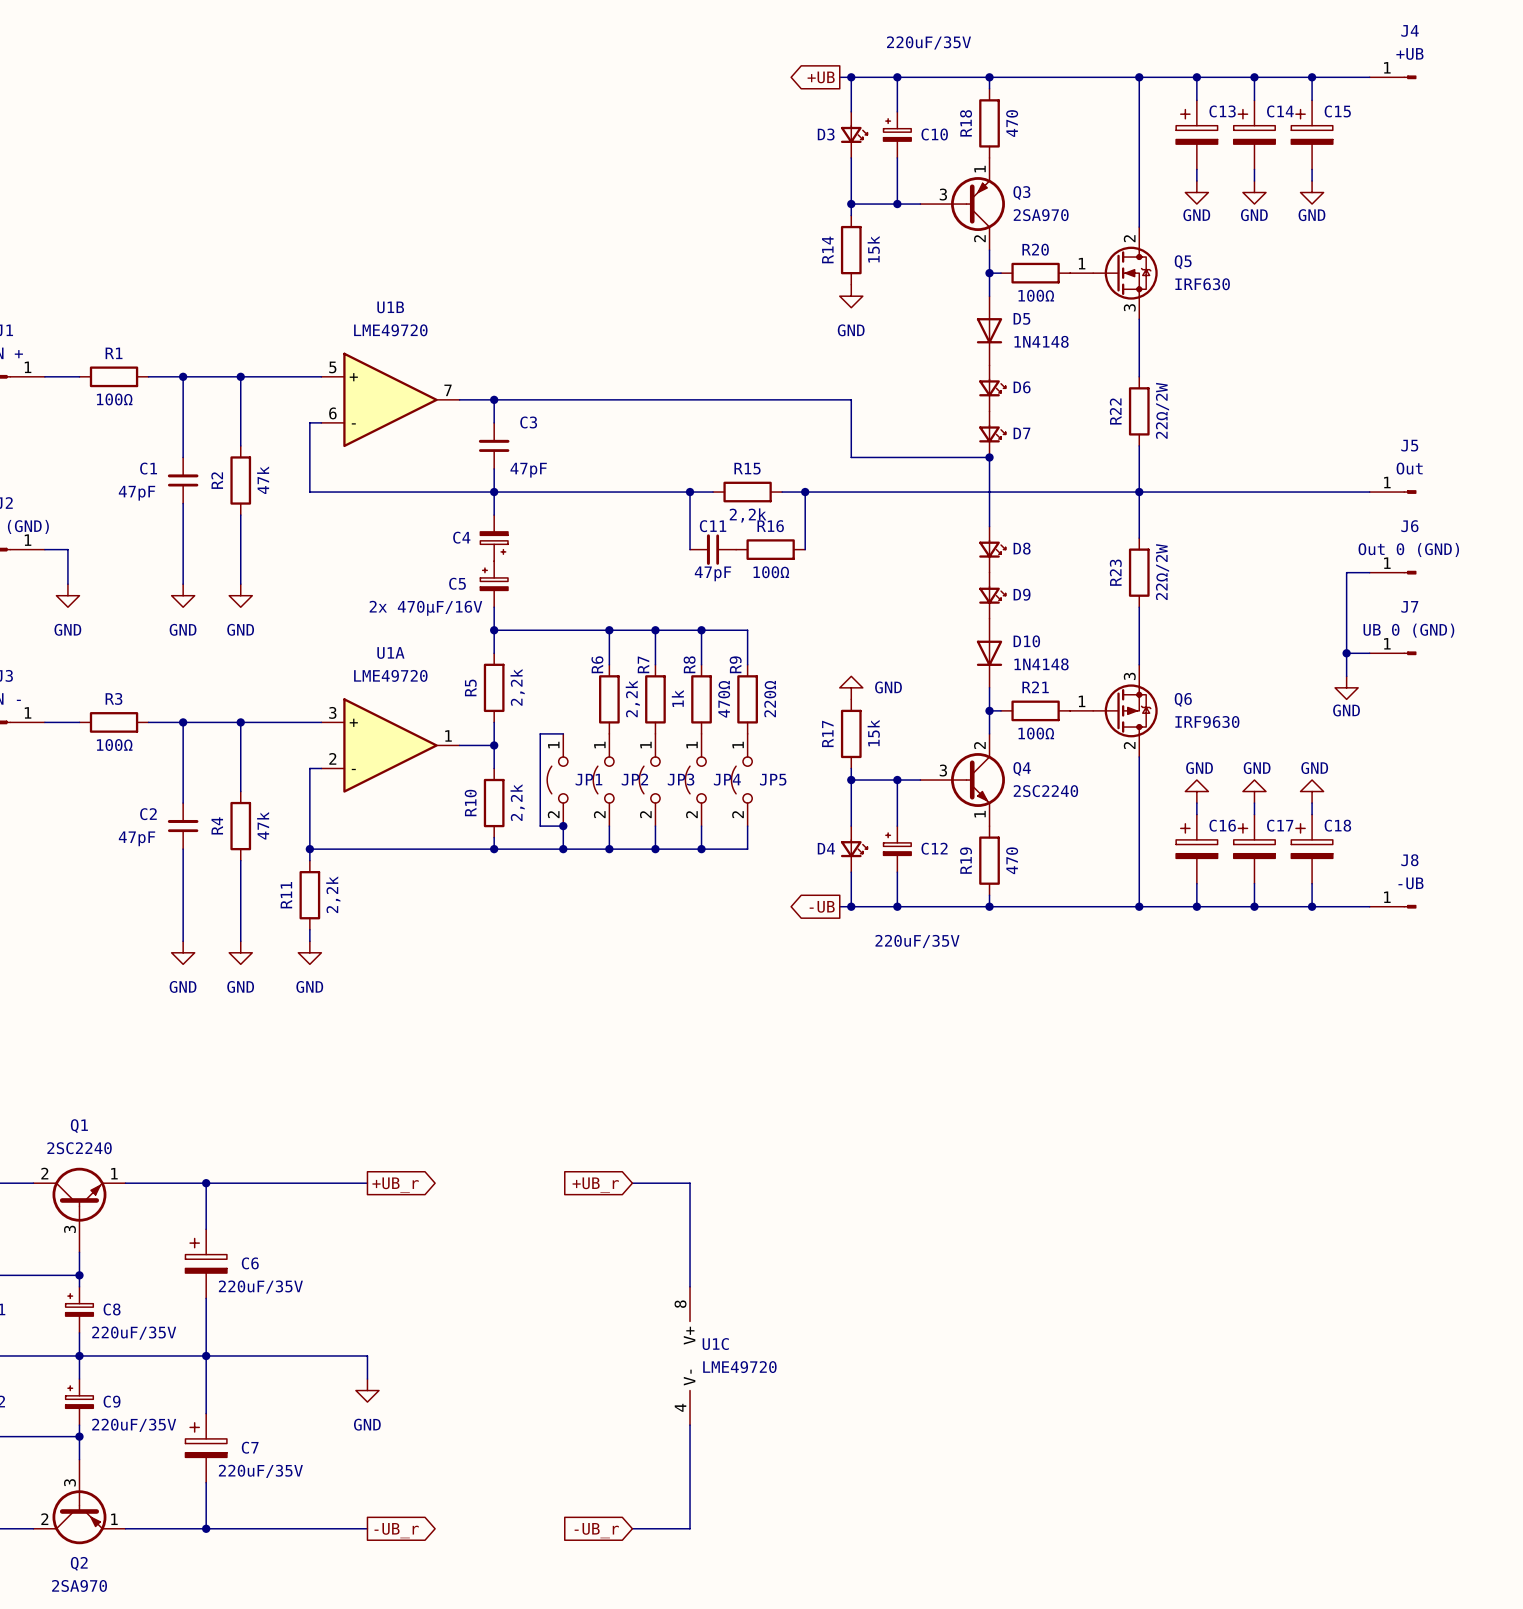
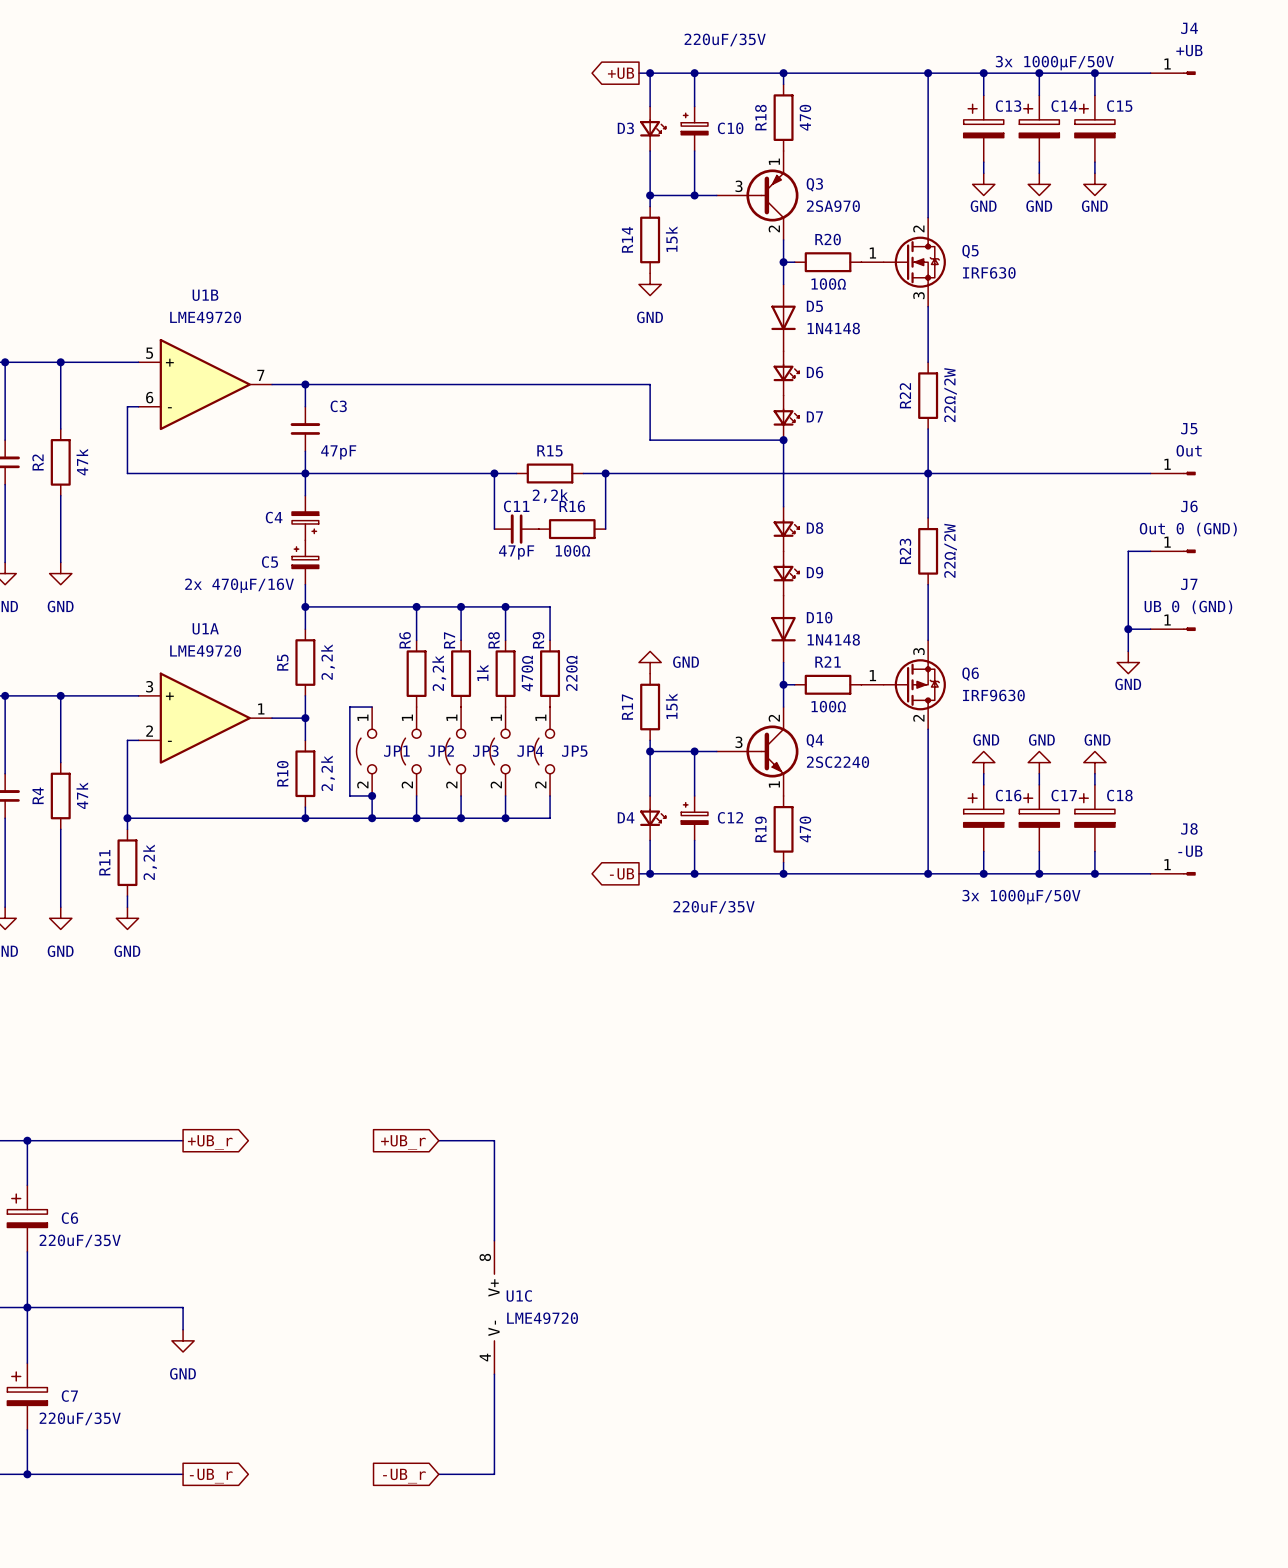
C13 value: none -> 3x 1000µF/50V (1054, 63)
C16 value: none -> 3x 1000µF/50V (1021, 897)

